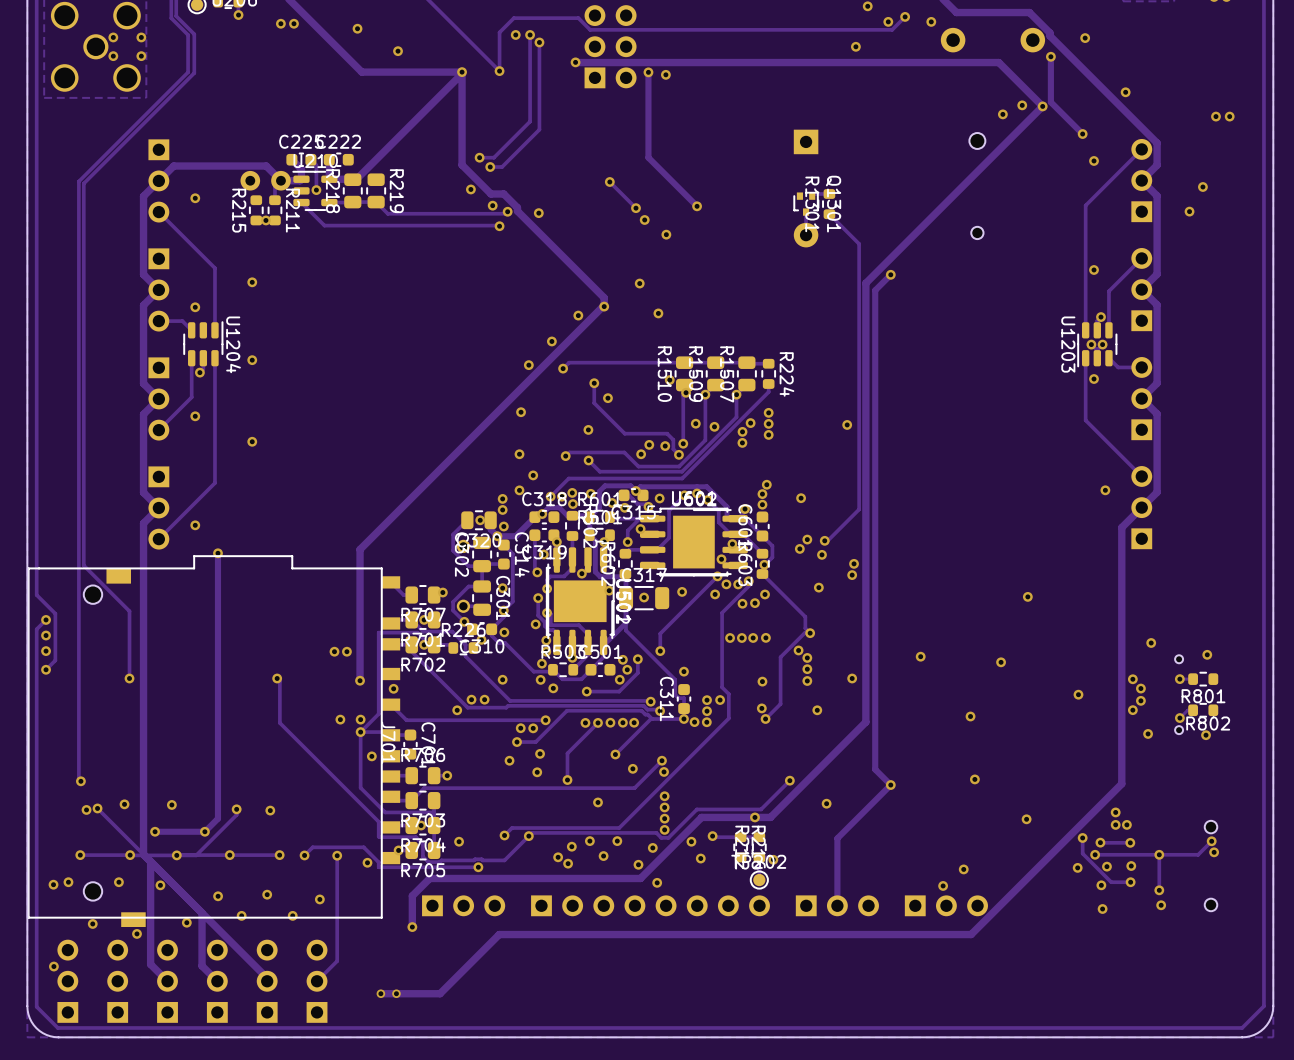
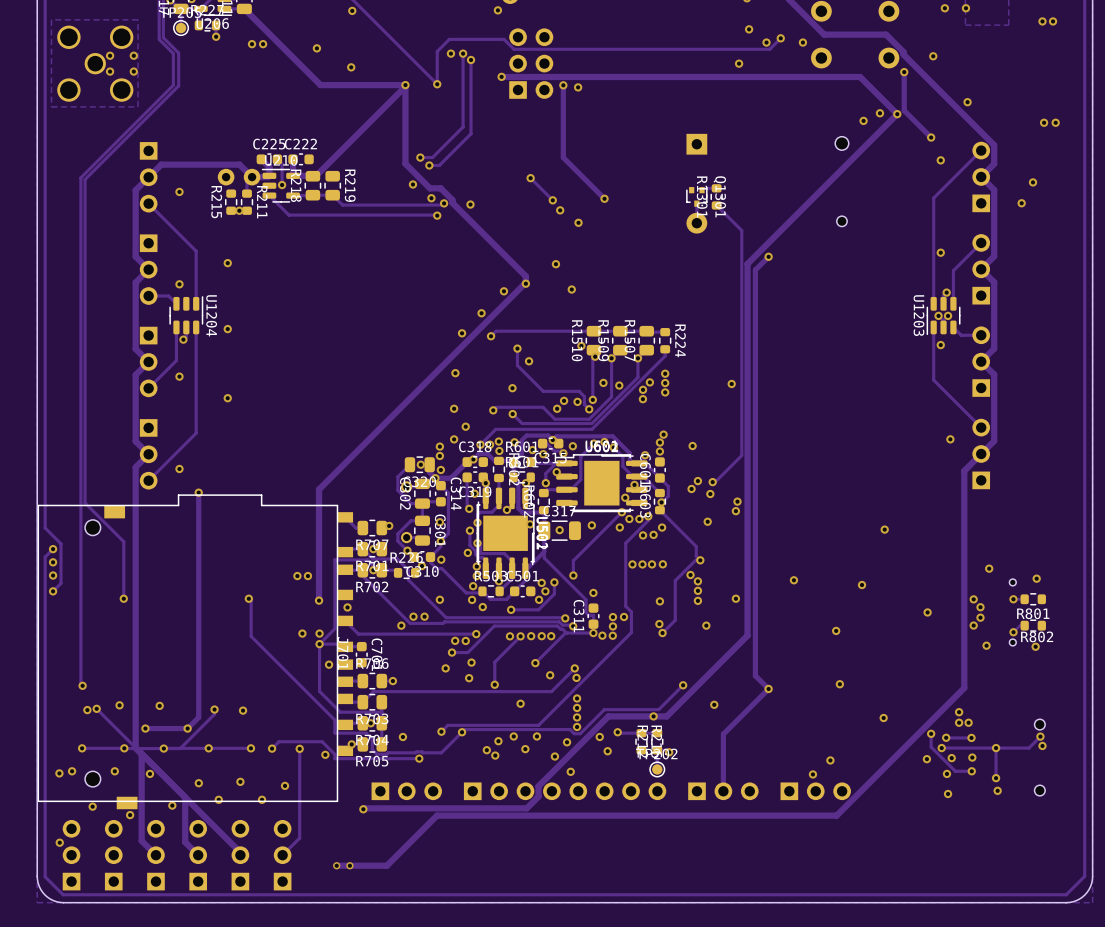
track: (640, 878) (429, 878) (412, 895) (412, 927) -> (556, 768) (538, 786) (538, 796) (526, 808) (363, 809)

